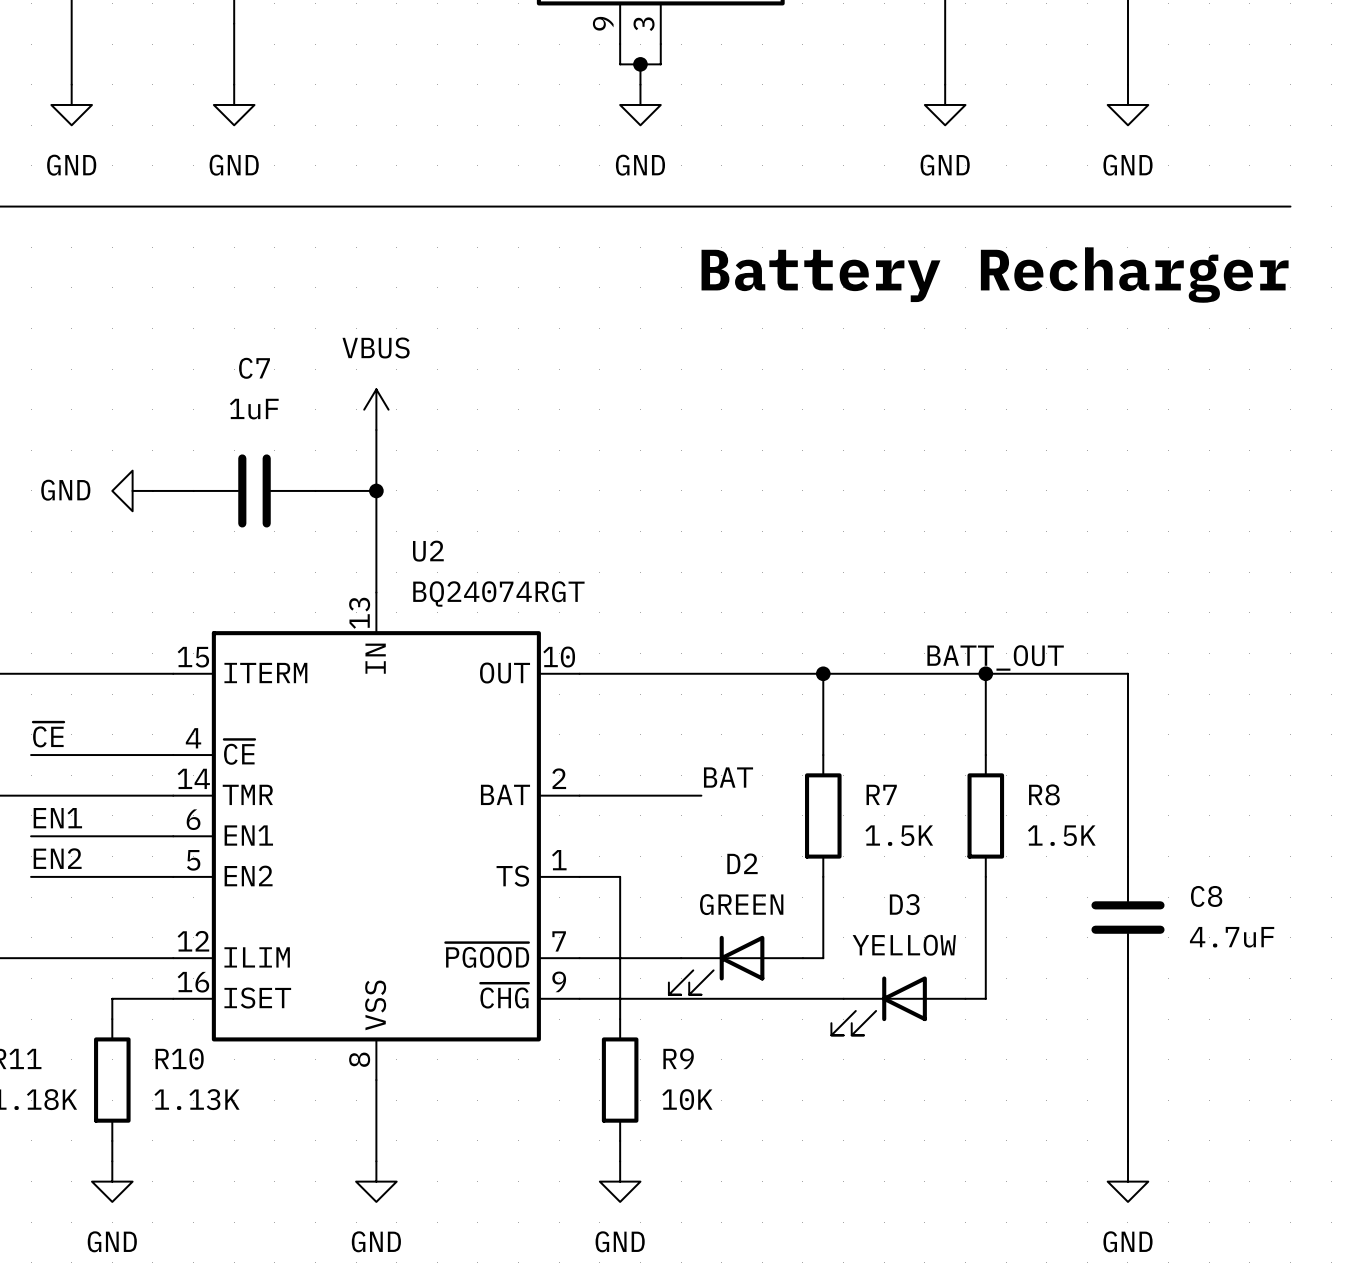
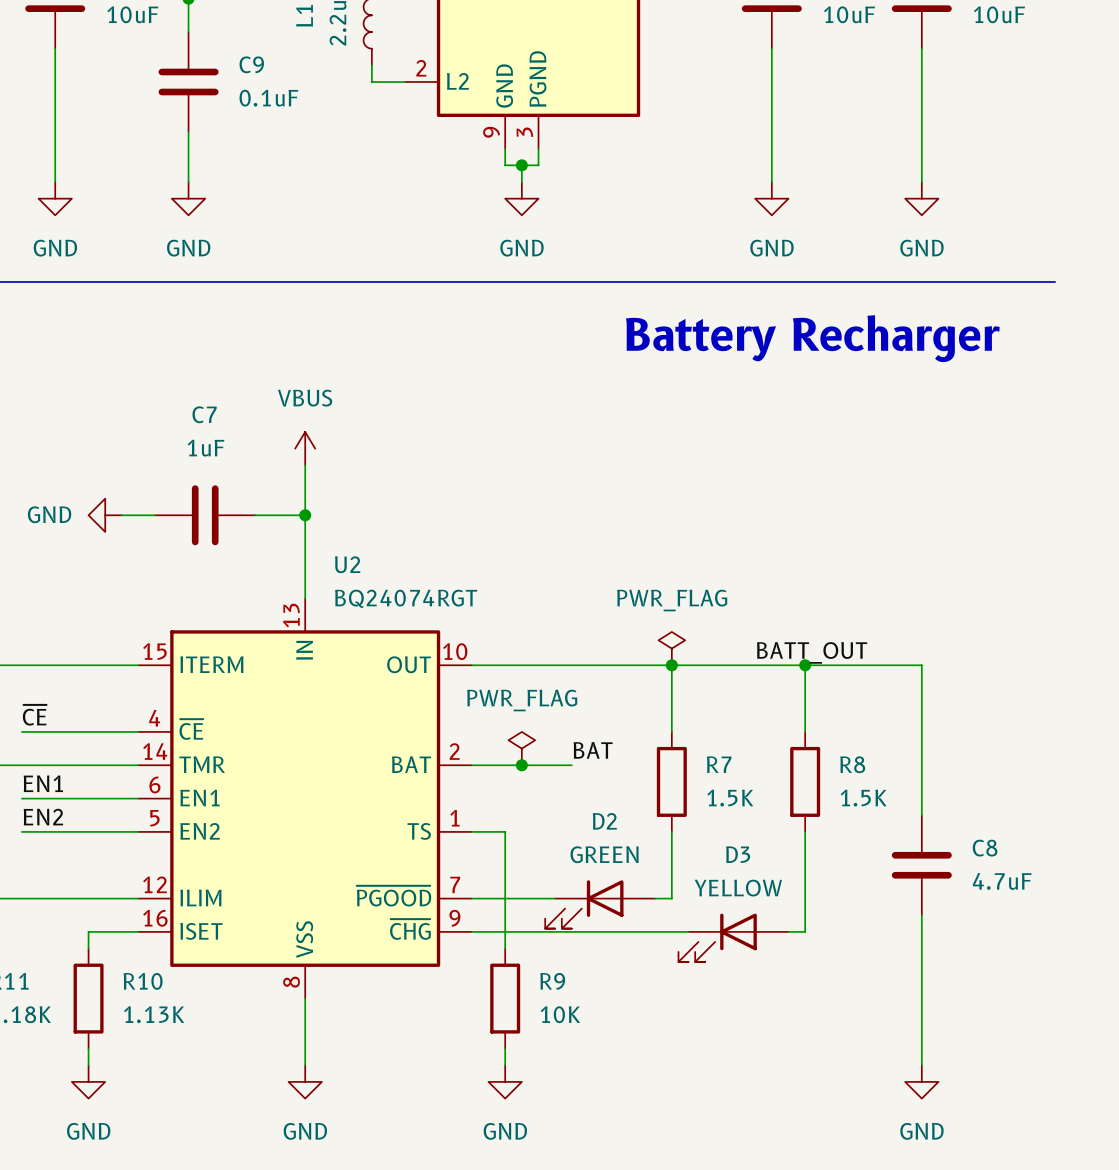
power symbol: none -> PWR_FLAG (671, 648)
power symbol: none -> PWR_FLAG (521, 748)
junction: none -> (521, 765)

